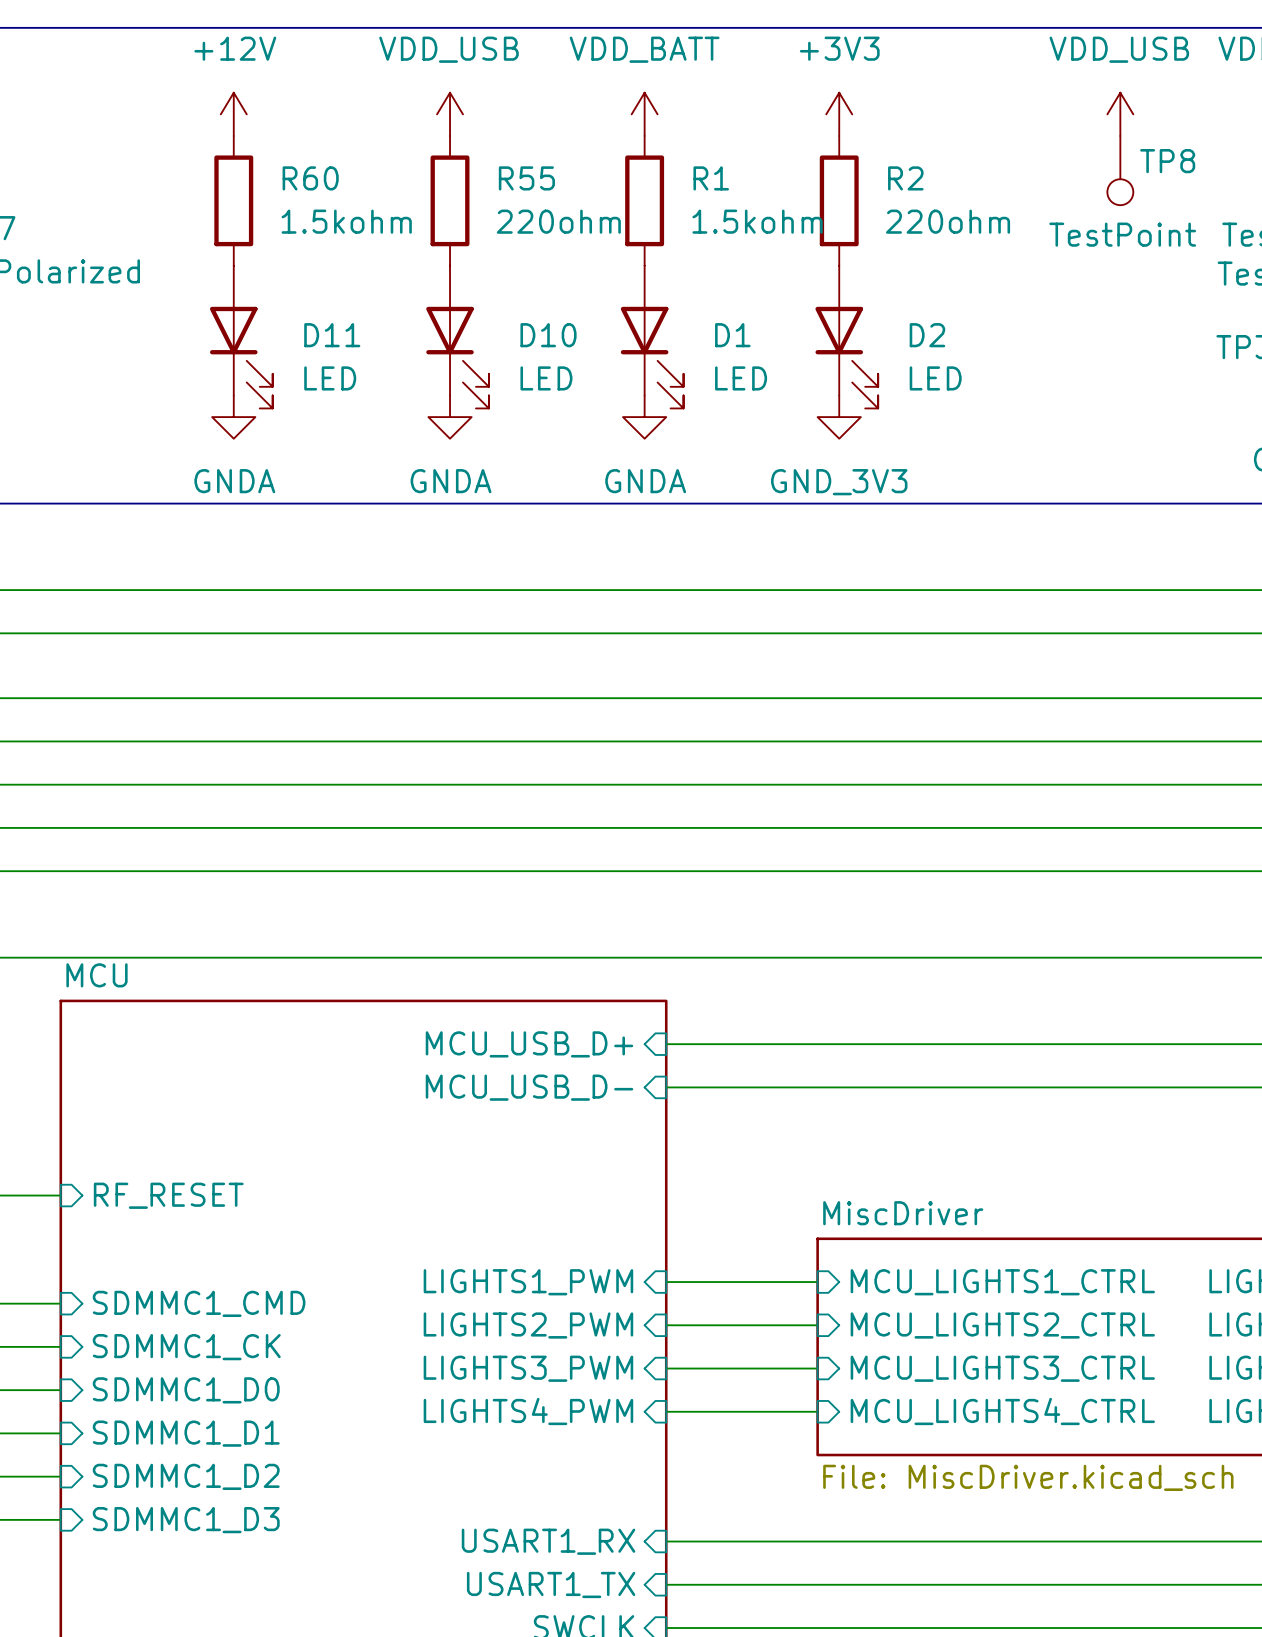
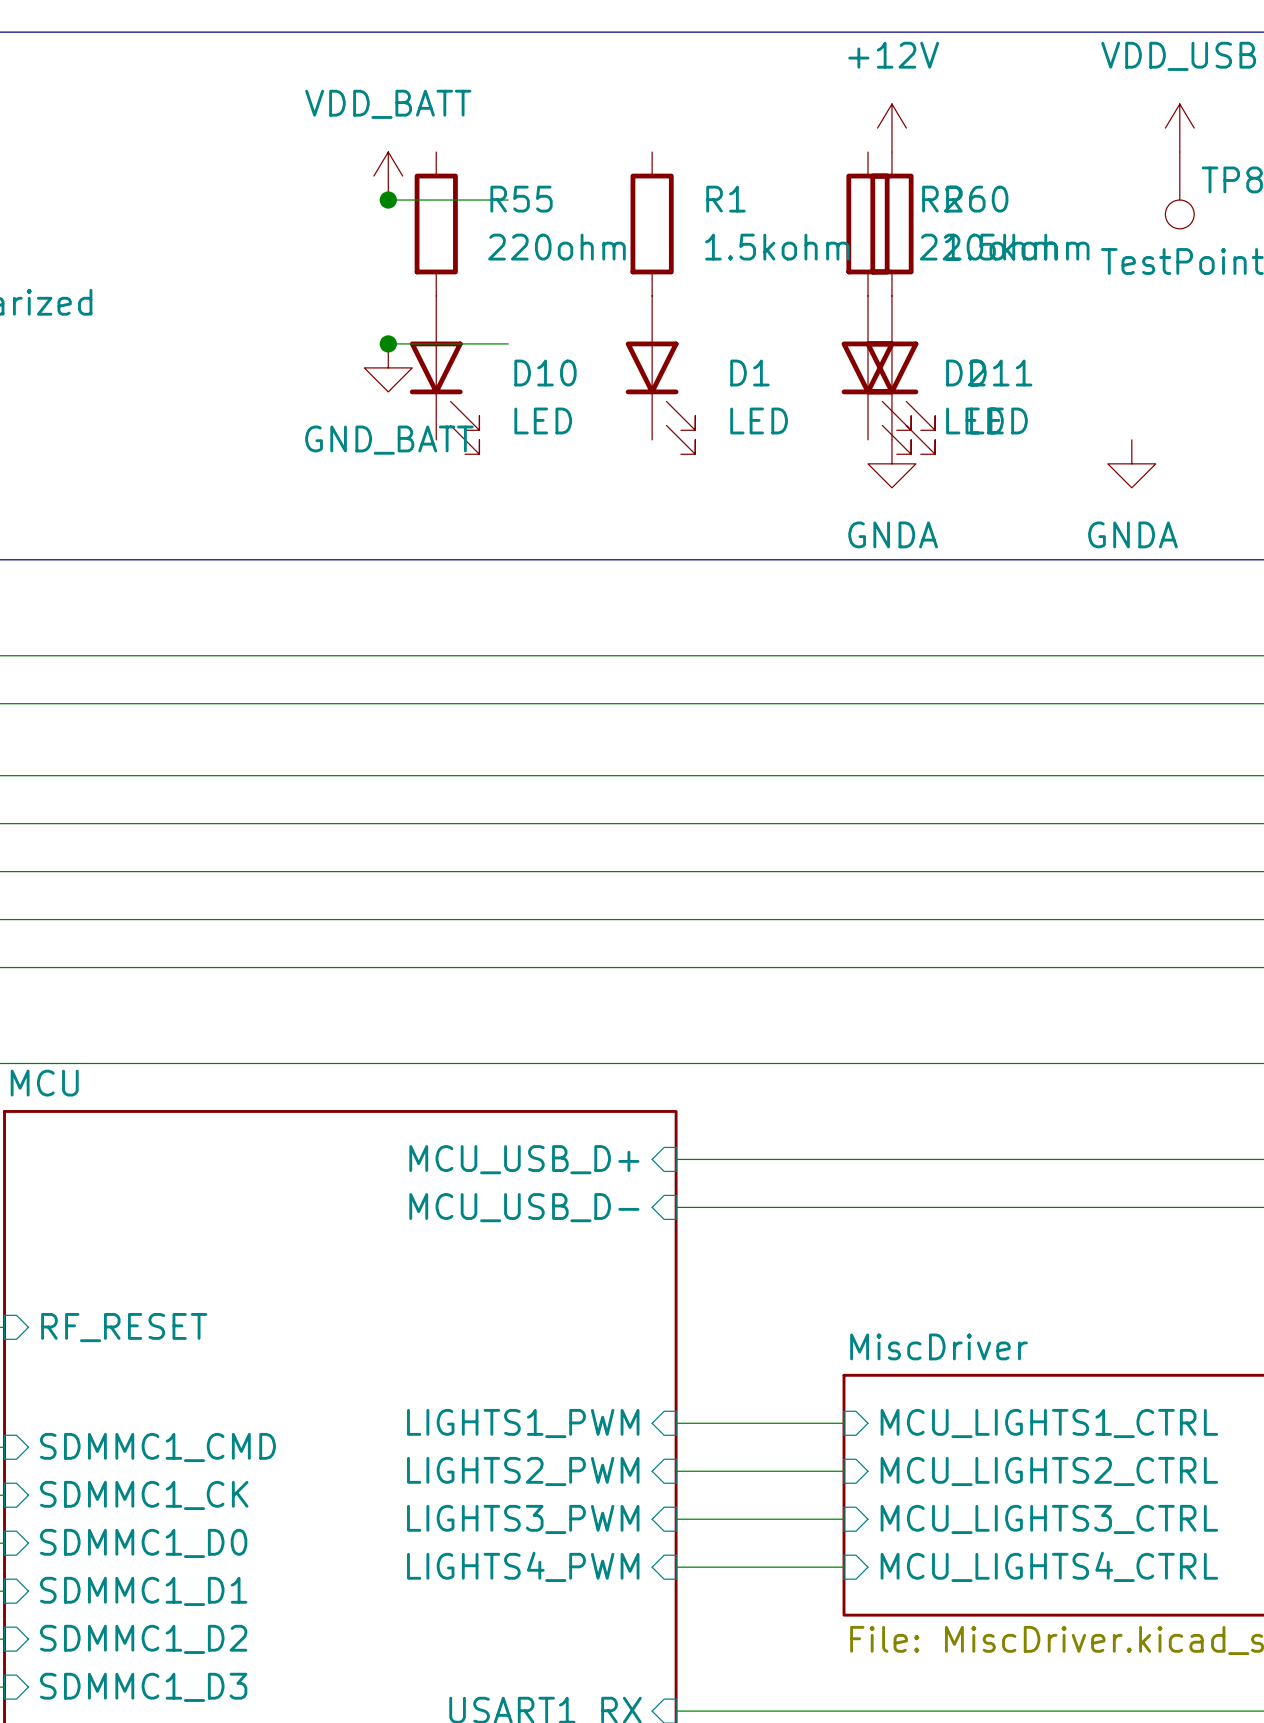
power symbol: +12V (233, 114) -> none
power symbol: VDD_USB (450, 114) -> none
power symbol position: VDD_BATT (644, 114) -> VDD_BATT (388, 176)
power symbol: +3V3 (839, 114) -> none
power symbol: none -> +12V (891, 128)
wire: none -> (388, 200) (508, 200)
junction: none -> (388, 200)
R60 position: (233, 200) -> (891, 224)
wire: none -> (388, 343) (508, 343)
junction: none -> (388, 343)
power symbol: none -> GND_BATT (388, 367)
D11 position: (241, 337) -> (900, 375)
power symbol: GNDA (233, 417) -> none
power symbol: GNDA (450, 417) -> none
power symbol: GNDA (644, 417) -> none
power symbol: GND_3V3 (839, 417) -> none
power symbol: none -> GNDA (891, 463)
power symbol: none -> GNDA (1131, 463)

